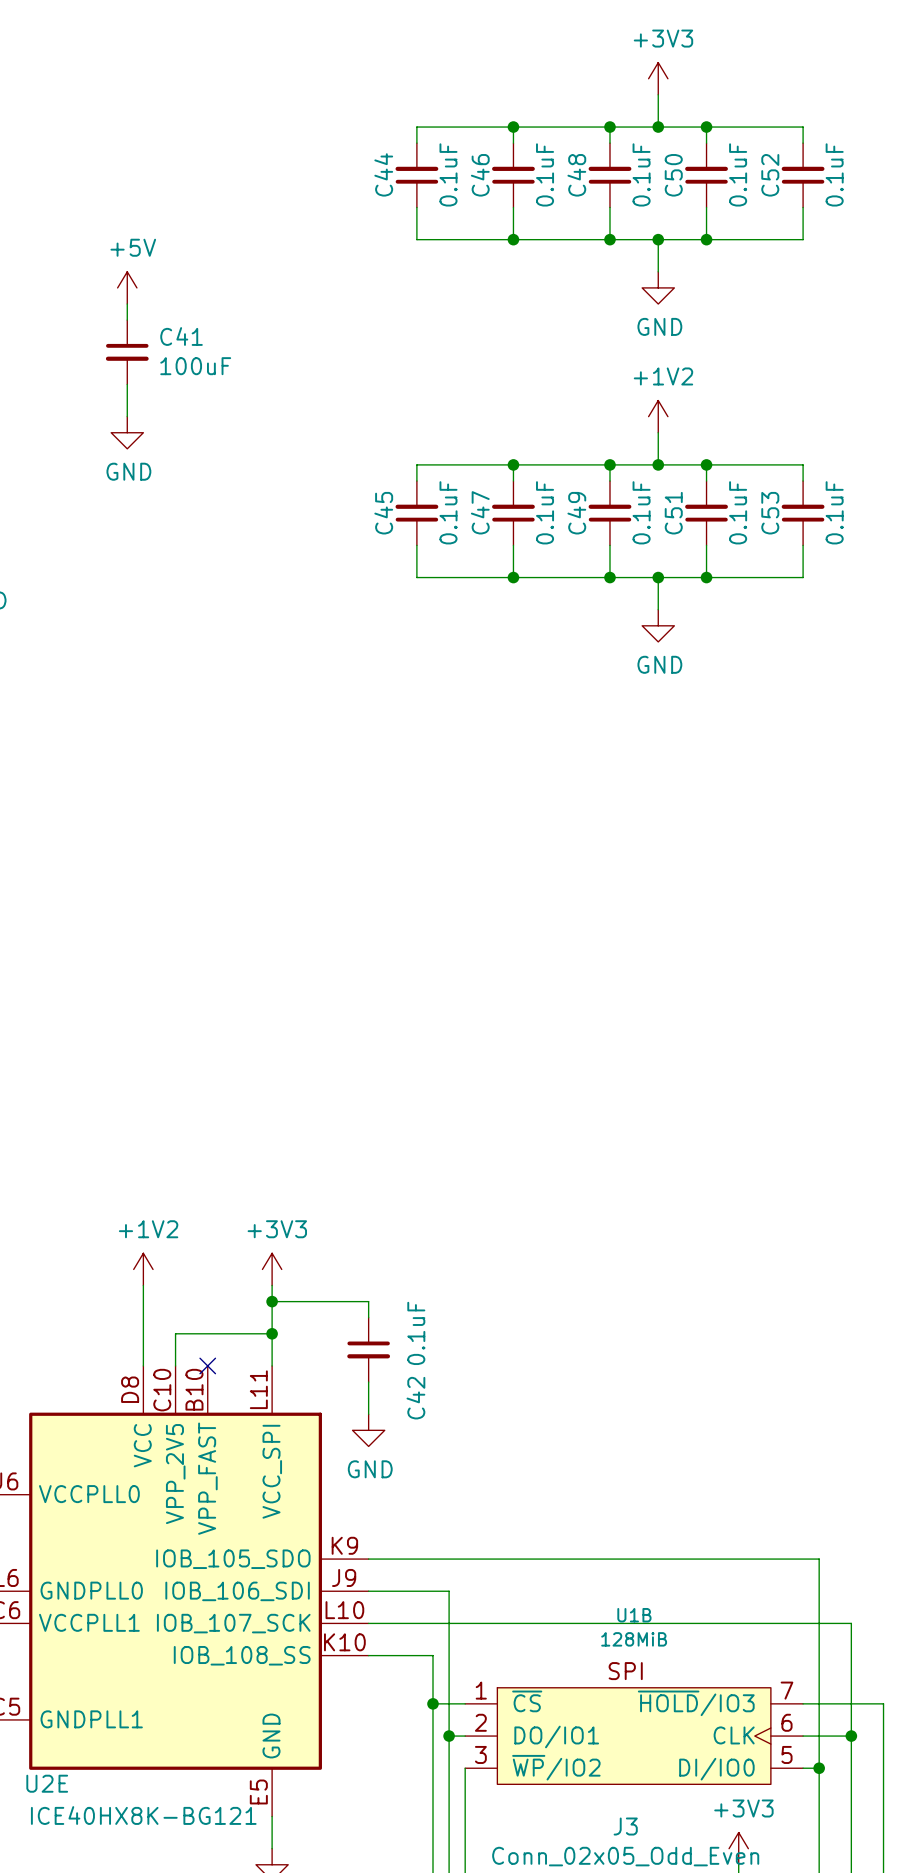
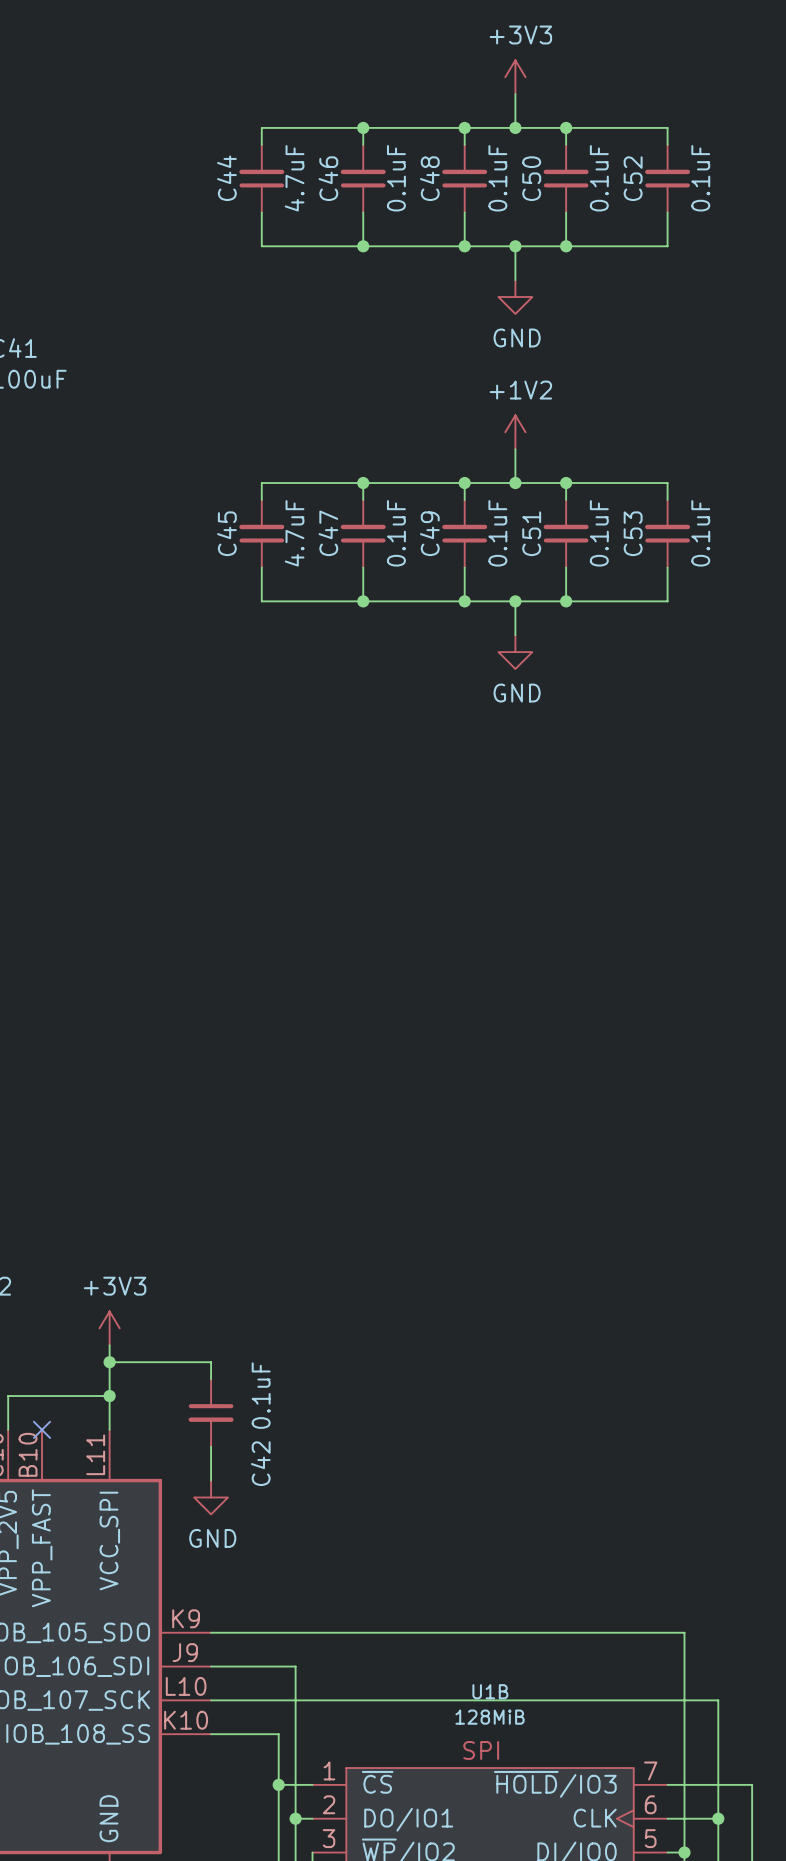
C44 value: 0.1uF (448, 174) -> 4.7uF (294, 178)
C45 value: 0.1uF (448, 512) -> 4.7uF (294, 533)

